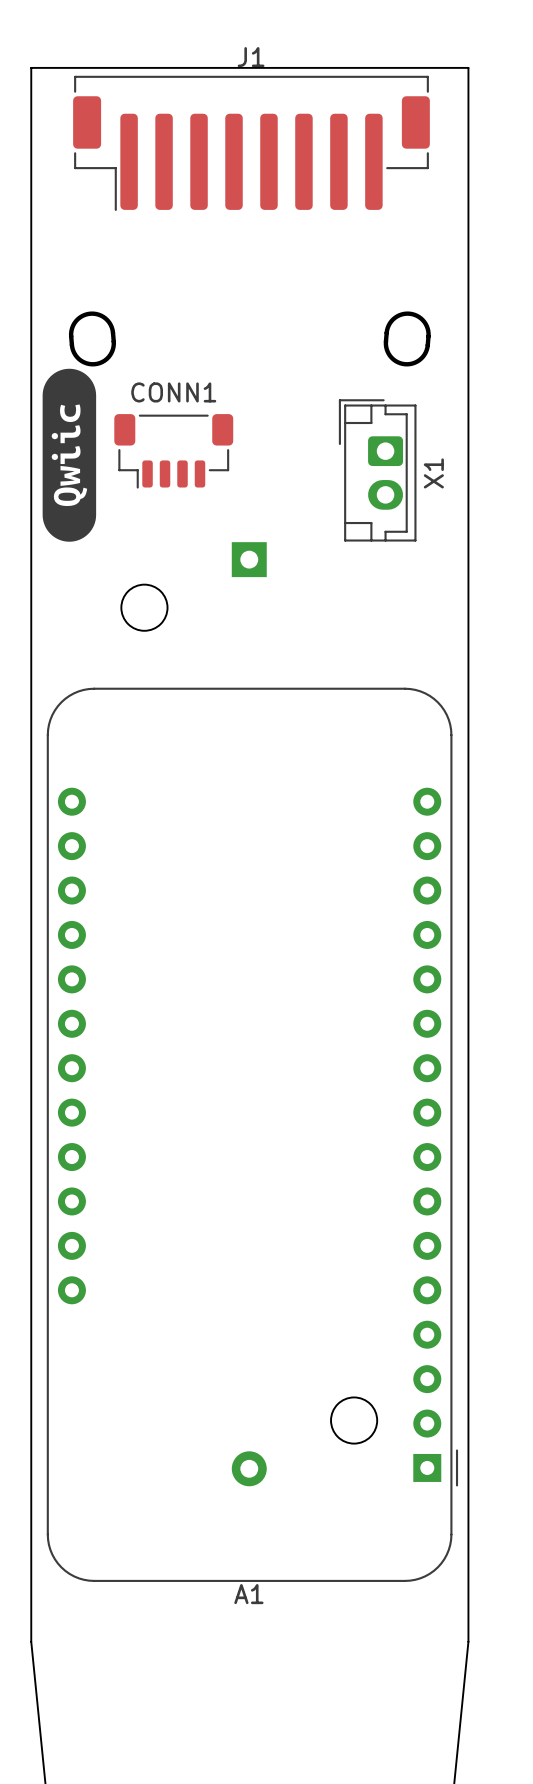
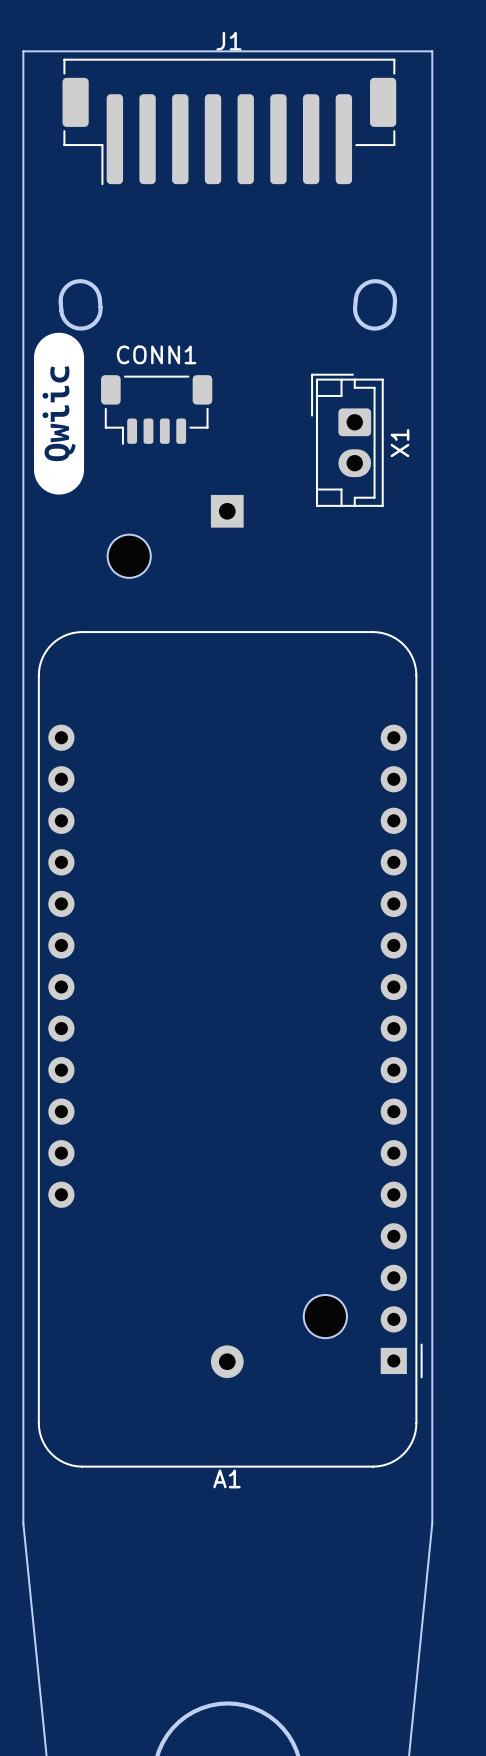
X1 position: (377, 470) -> (347, 440)

